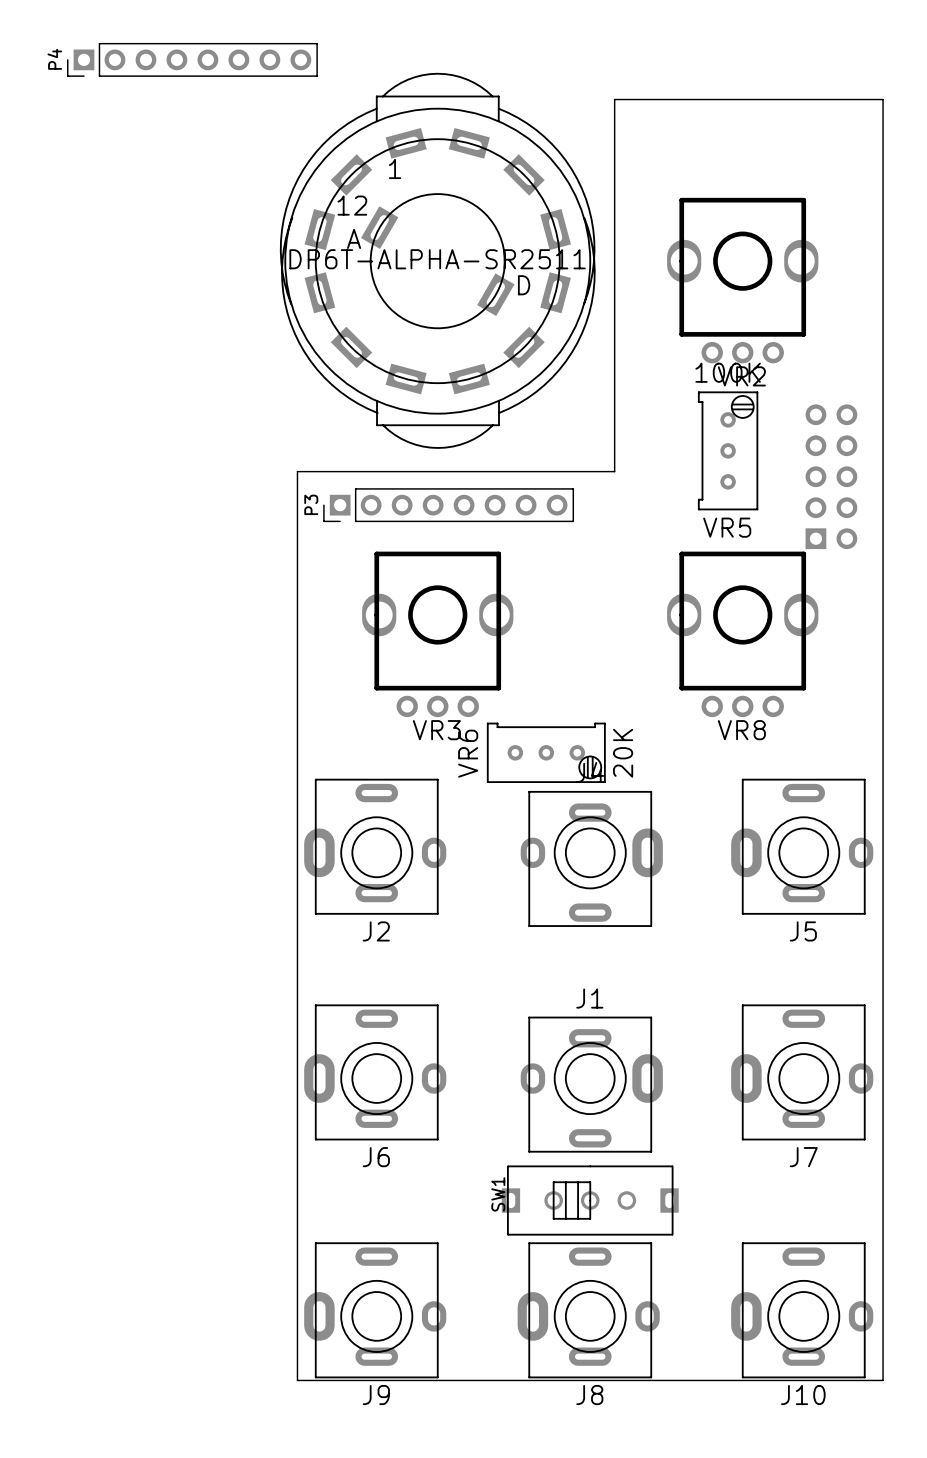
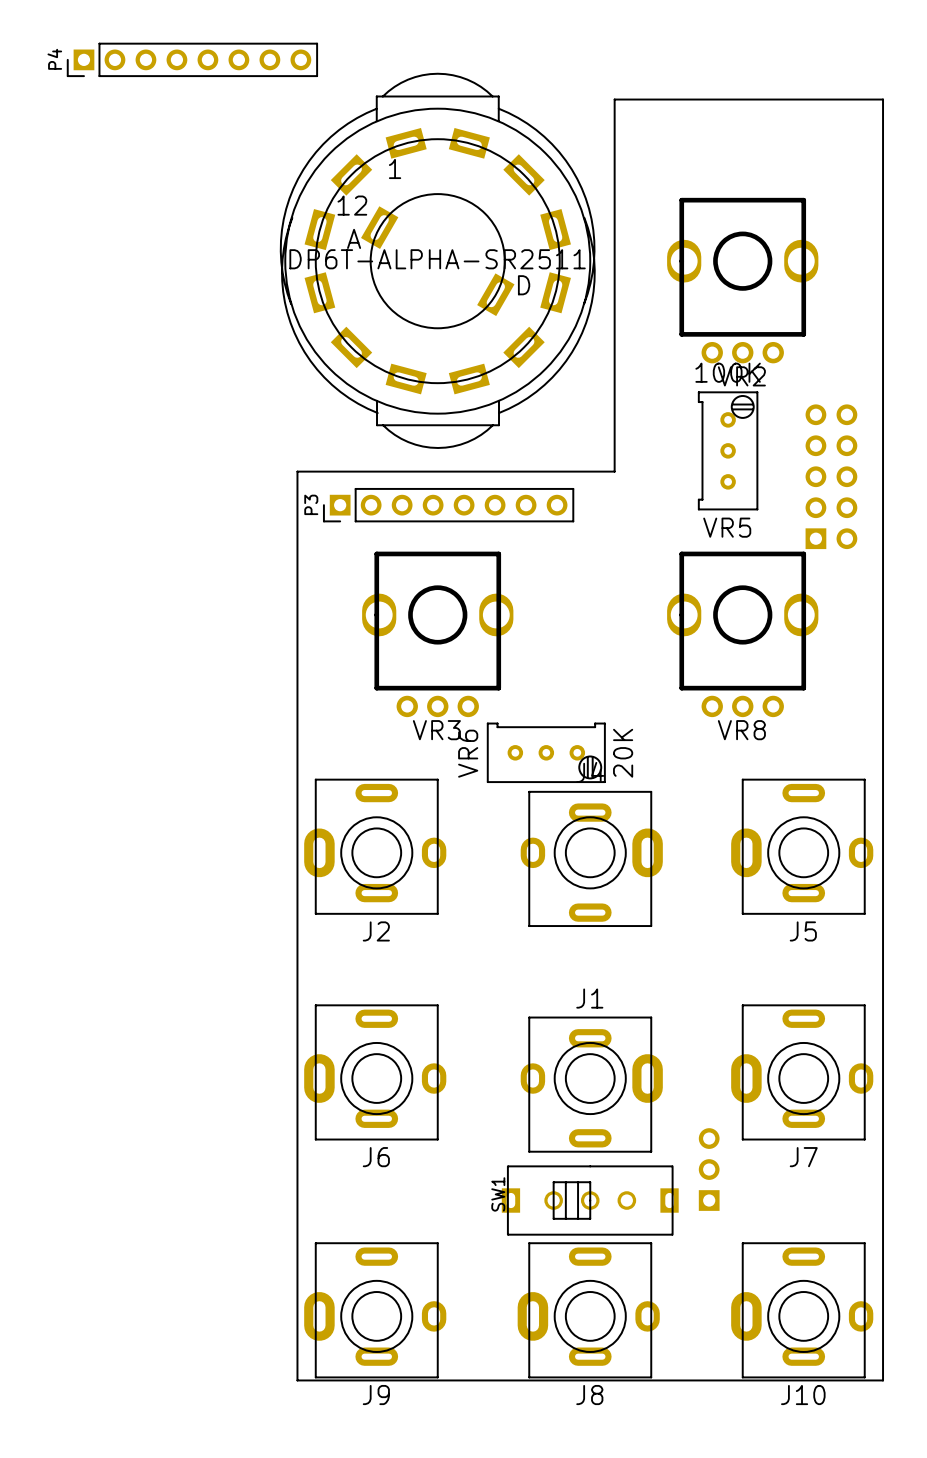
part: none -> (709, 1169)

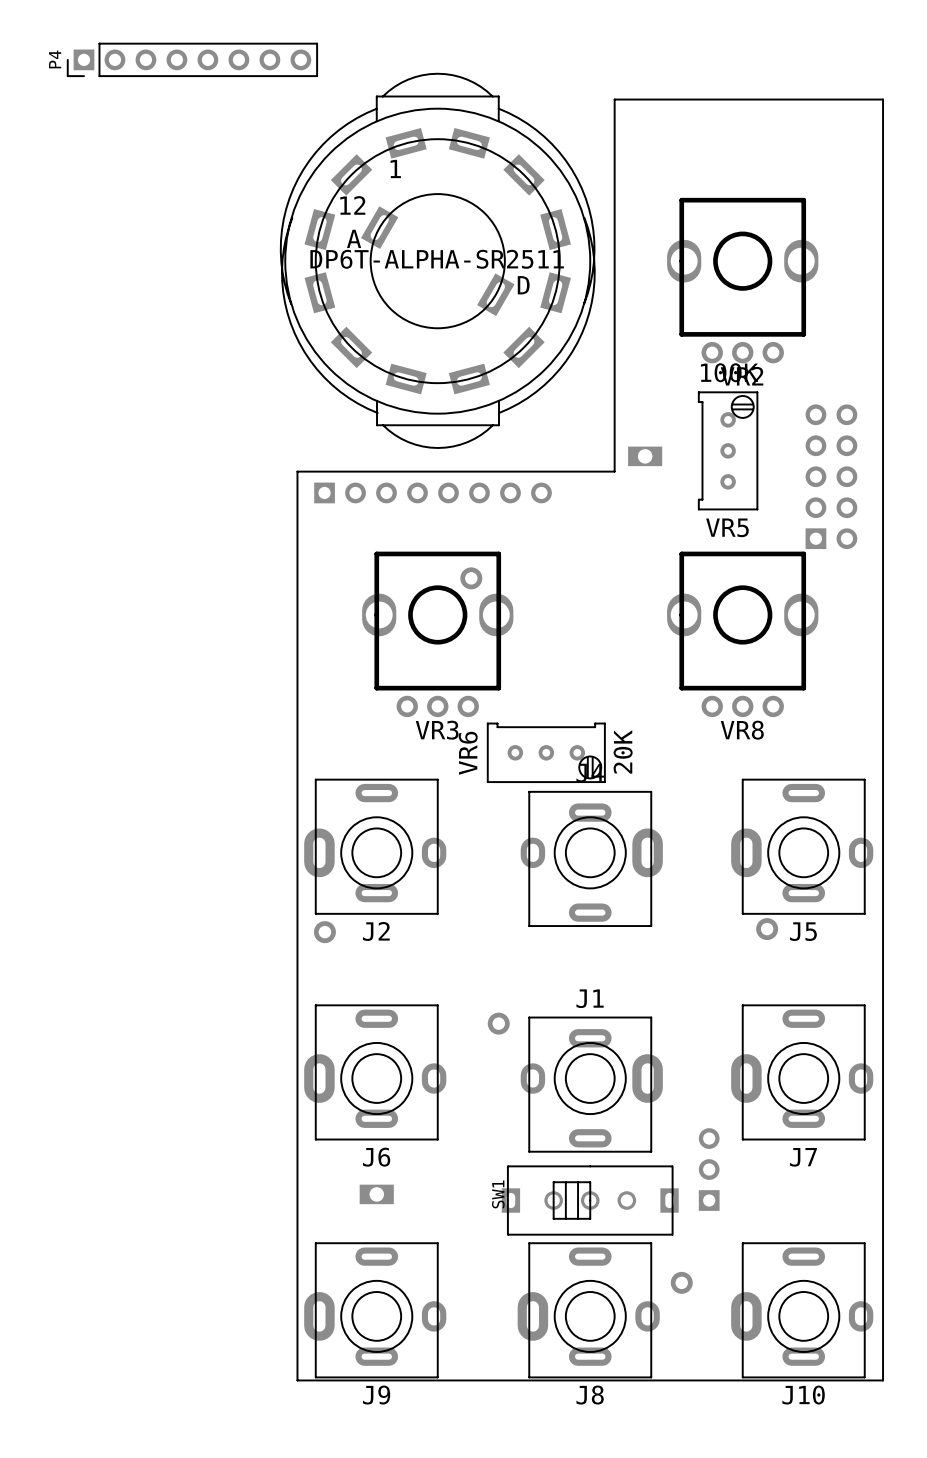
part: none -> (645, 456)
P3 side: top (448, 505) -> bottom (433, 492)
part: none -> (471, 578)
part: none -> (767, 929)
part: none -> (324, 932)
part: none -> (498, 1023)
part: none -> (376, 1194)
part: none -> (681, 1282)

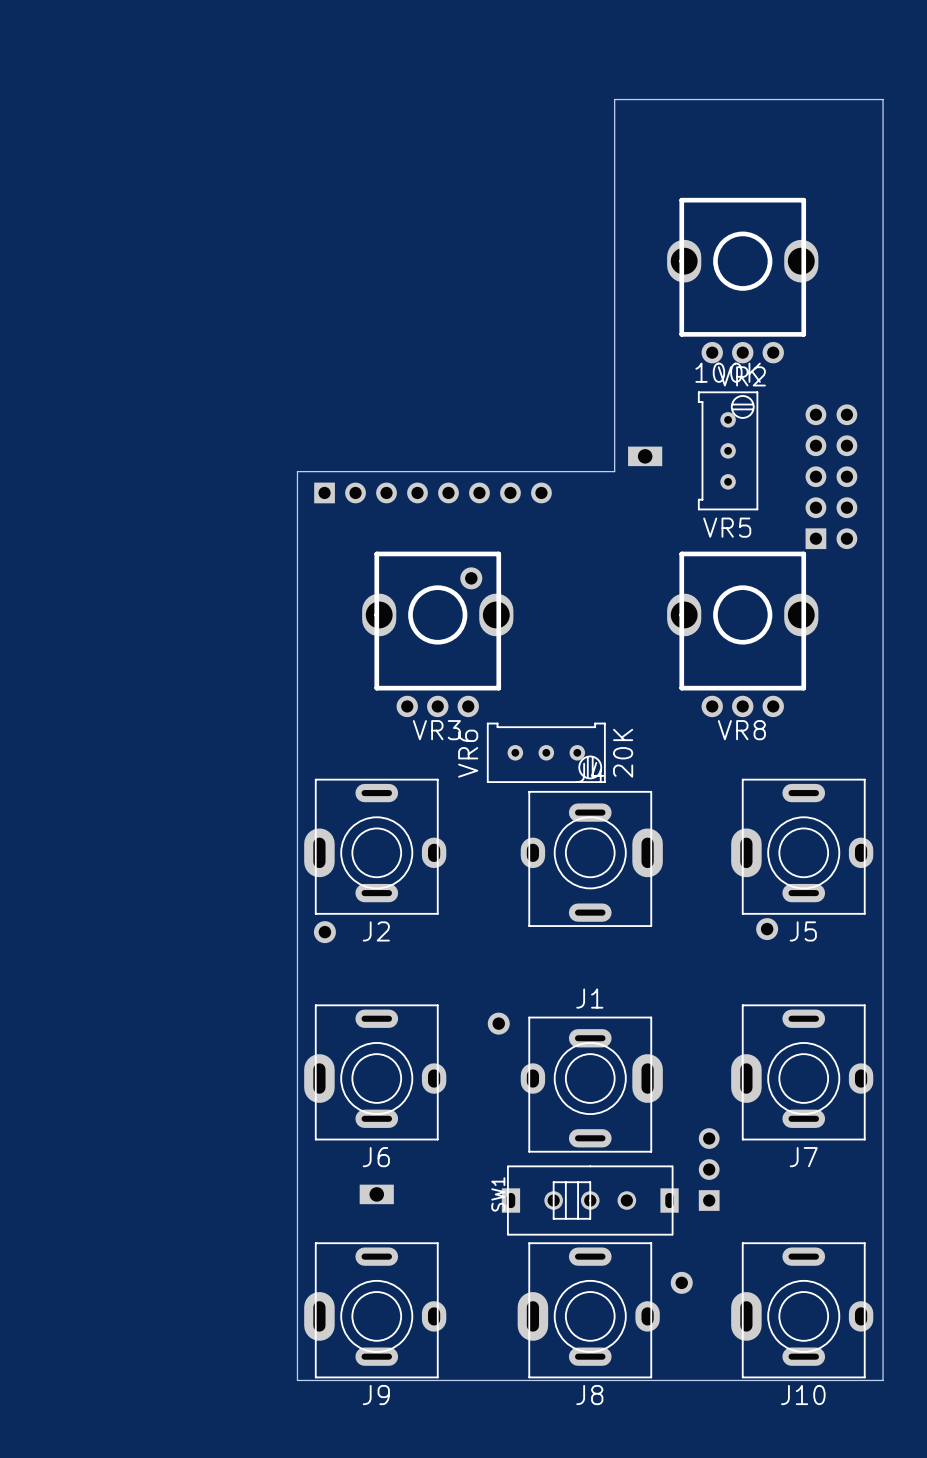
P4: (192, 59) -> none
part: DP6T-ALPHA-SR2511 (437, 260) -> none

